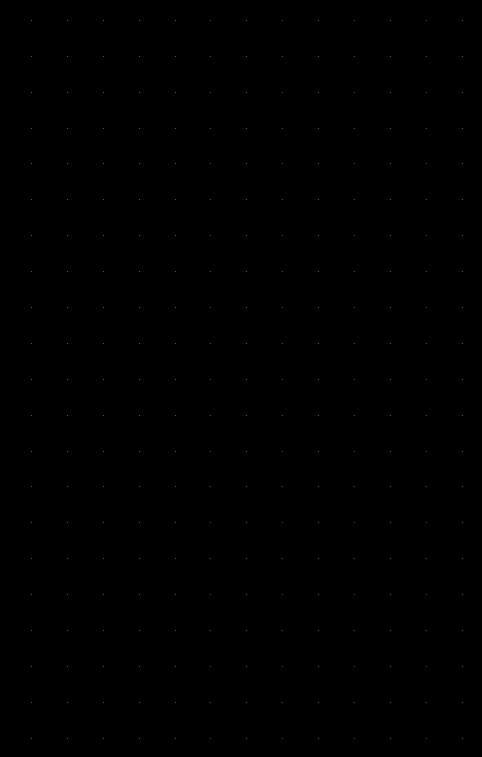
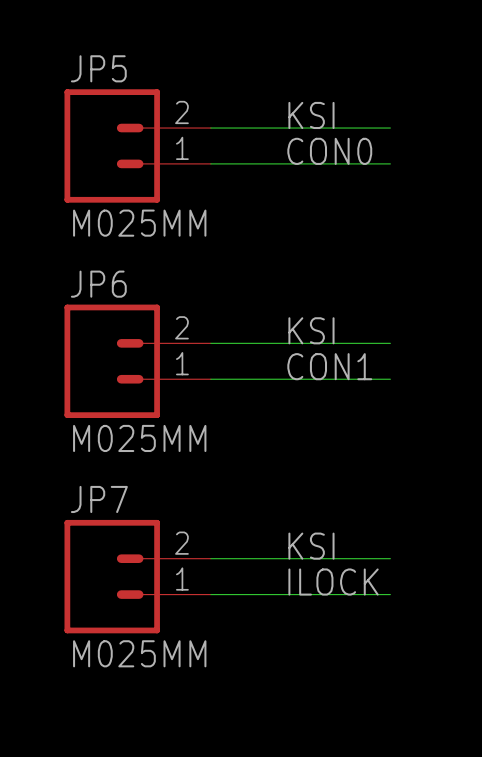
label: none -> KSI (311, 115)
wire: none -> (210, 128) (390, 128)
JP5: none -> M025MM (137, 145)
label: none -> CON0 (329, 151)
wire: none -> (210, 163) (390, 163)
label: none -> KSI (311, 330)
wire: none -> (210, 343) (390, 343)
JP6: none -> M025MM (137, 361)
label: none -> CON1 (329, 366)
wire: none -> (210, 379) (390, 379)
label: none -> KSI (311, 546)
wire: none -> (210, 558) (390, 558)
JP7: none -> M025MM (137, 576)
label: none -> ILOCK (333, 582)
wire: none -> (210, 594) (390, 594)

